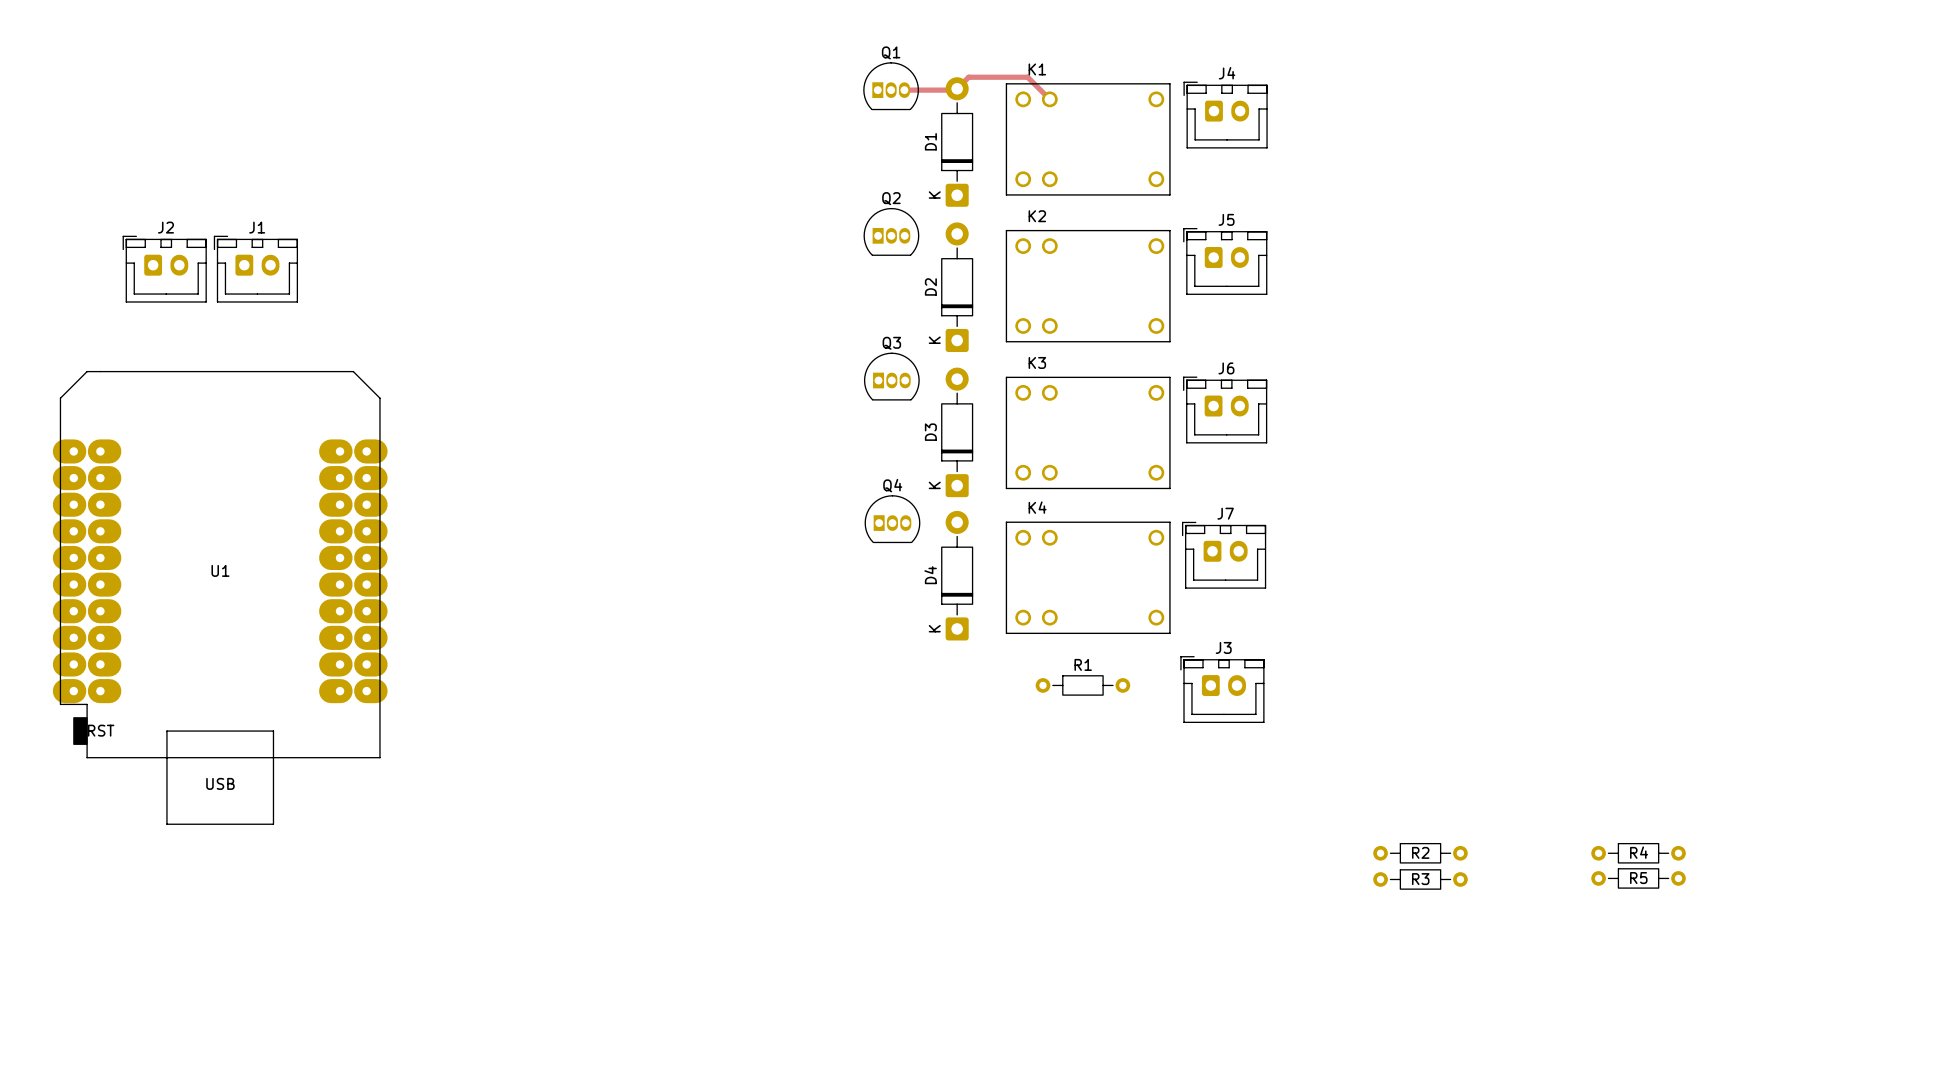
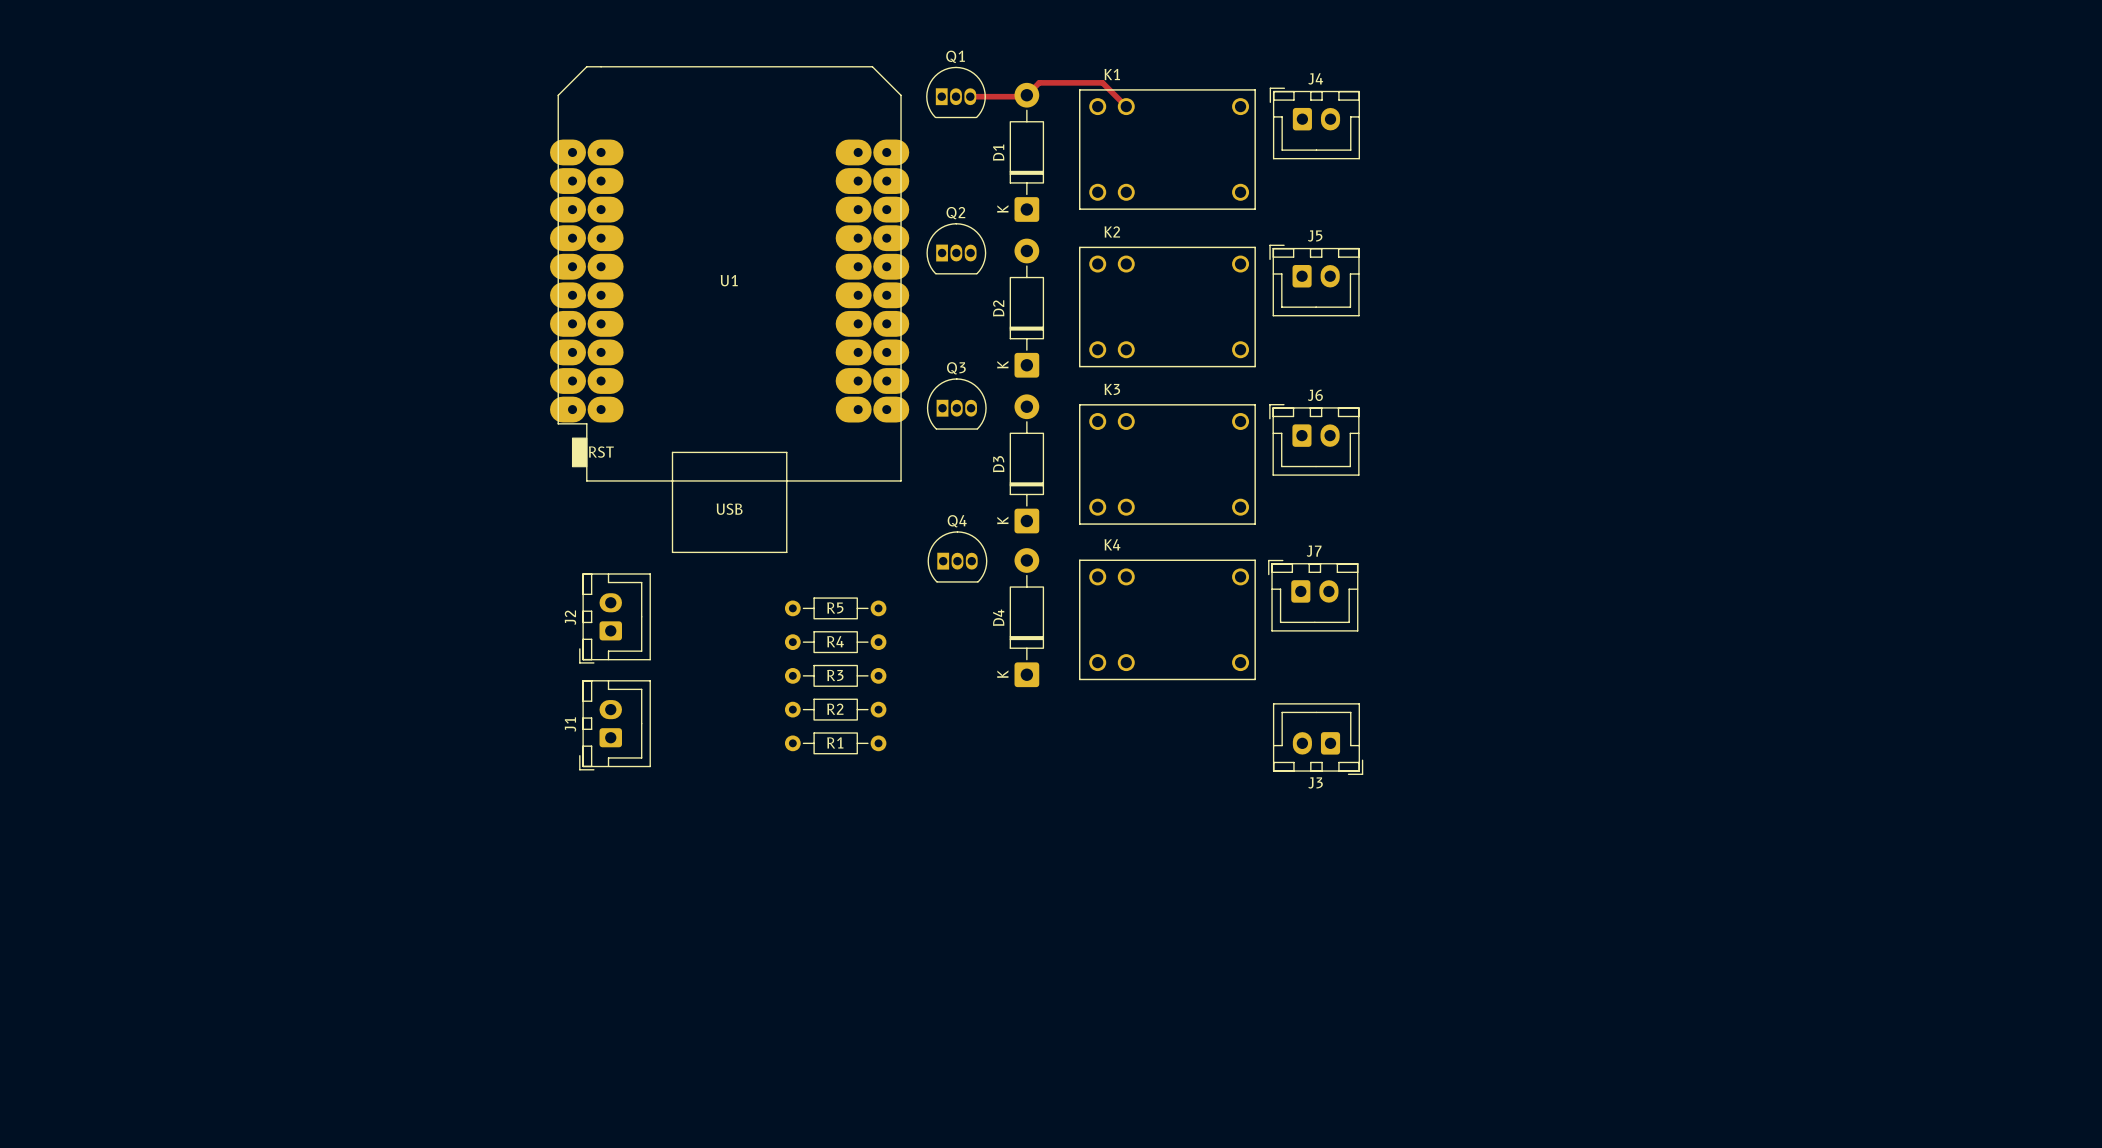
J2 rotation: 0° (164, 269) -> 90° counterclockwise (615, 618)
J2 position: (164, 269) -> (615, 618)
J1 rotation: 0° (255, 269) -> 90° counterclockwise (615, 725)
J1 position: (255, 269) -> (615, 725)
U1 position: (220, 597) -> (729, 309)
R1 name position: R1 (1083, 664) -> R1 (835, 742)
R1 position: (1082, 685) -> (835, 743)
J3 rotation: 0° (1222, 689) -> 180° (1318, 739)
R2 position: (1420, 853) -> (835, 709)
R4 position: (1638, 853) -> (835, 642)
R5 position: (1638, 878) -> (835, 608)
R3 position: (1420, 879) -> (835, 675)

